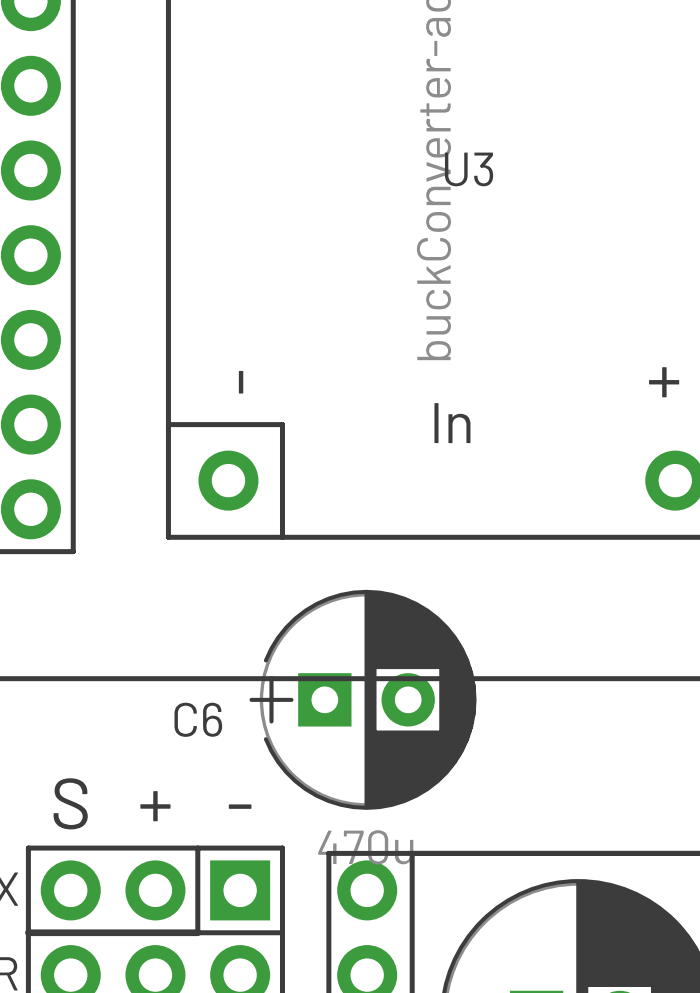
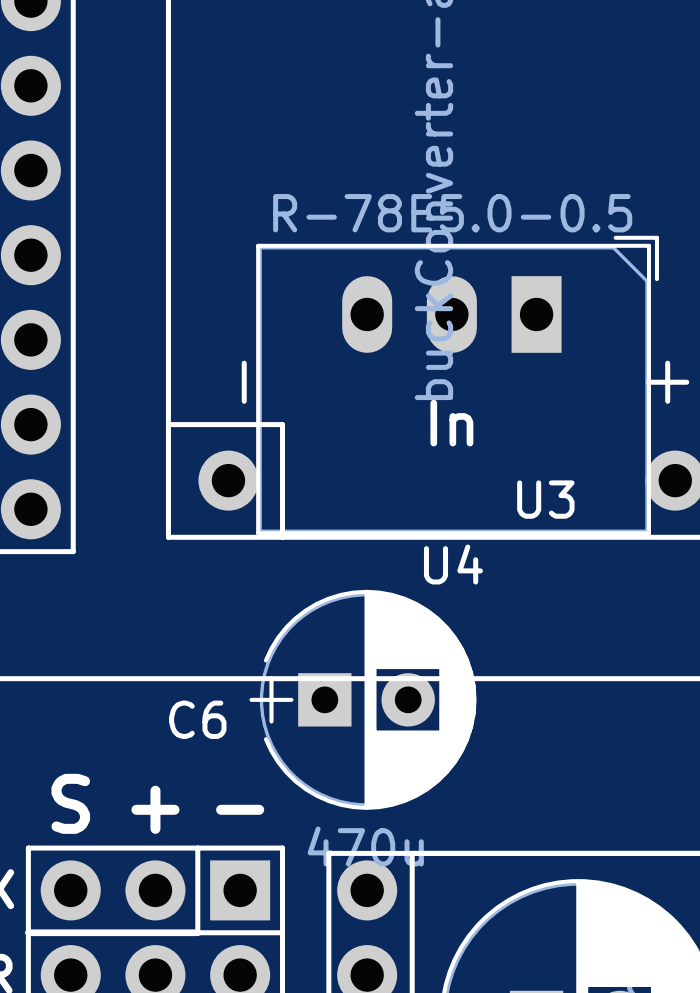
U3 name position: U3 (469, 169) -> U3 (545, 499)
U4: none -> R-78E5.0-0.5 (457, 385)

